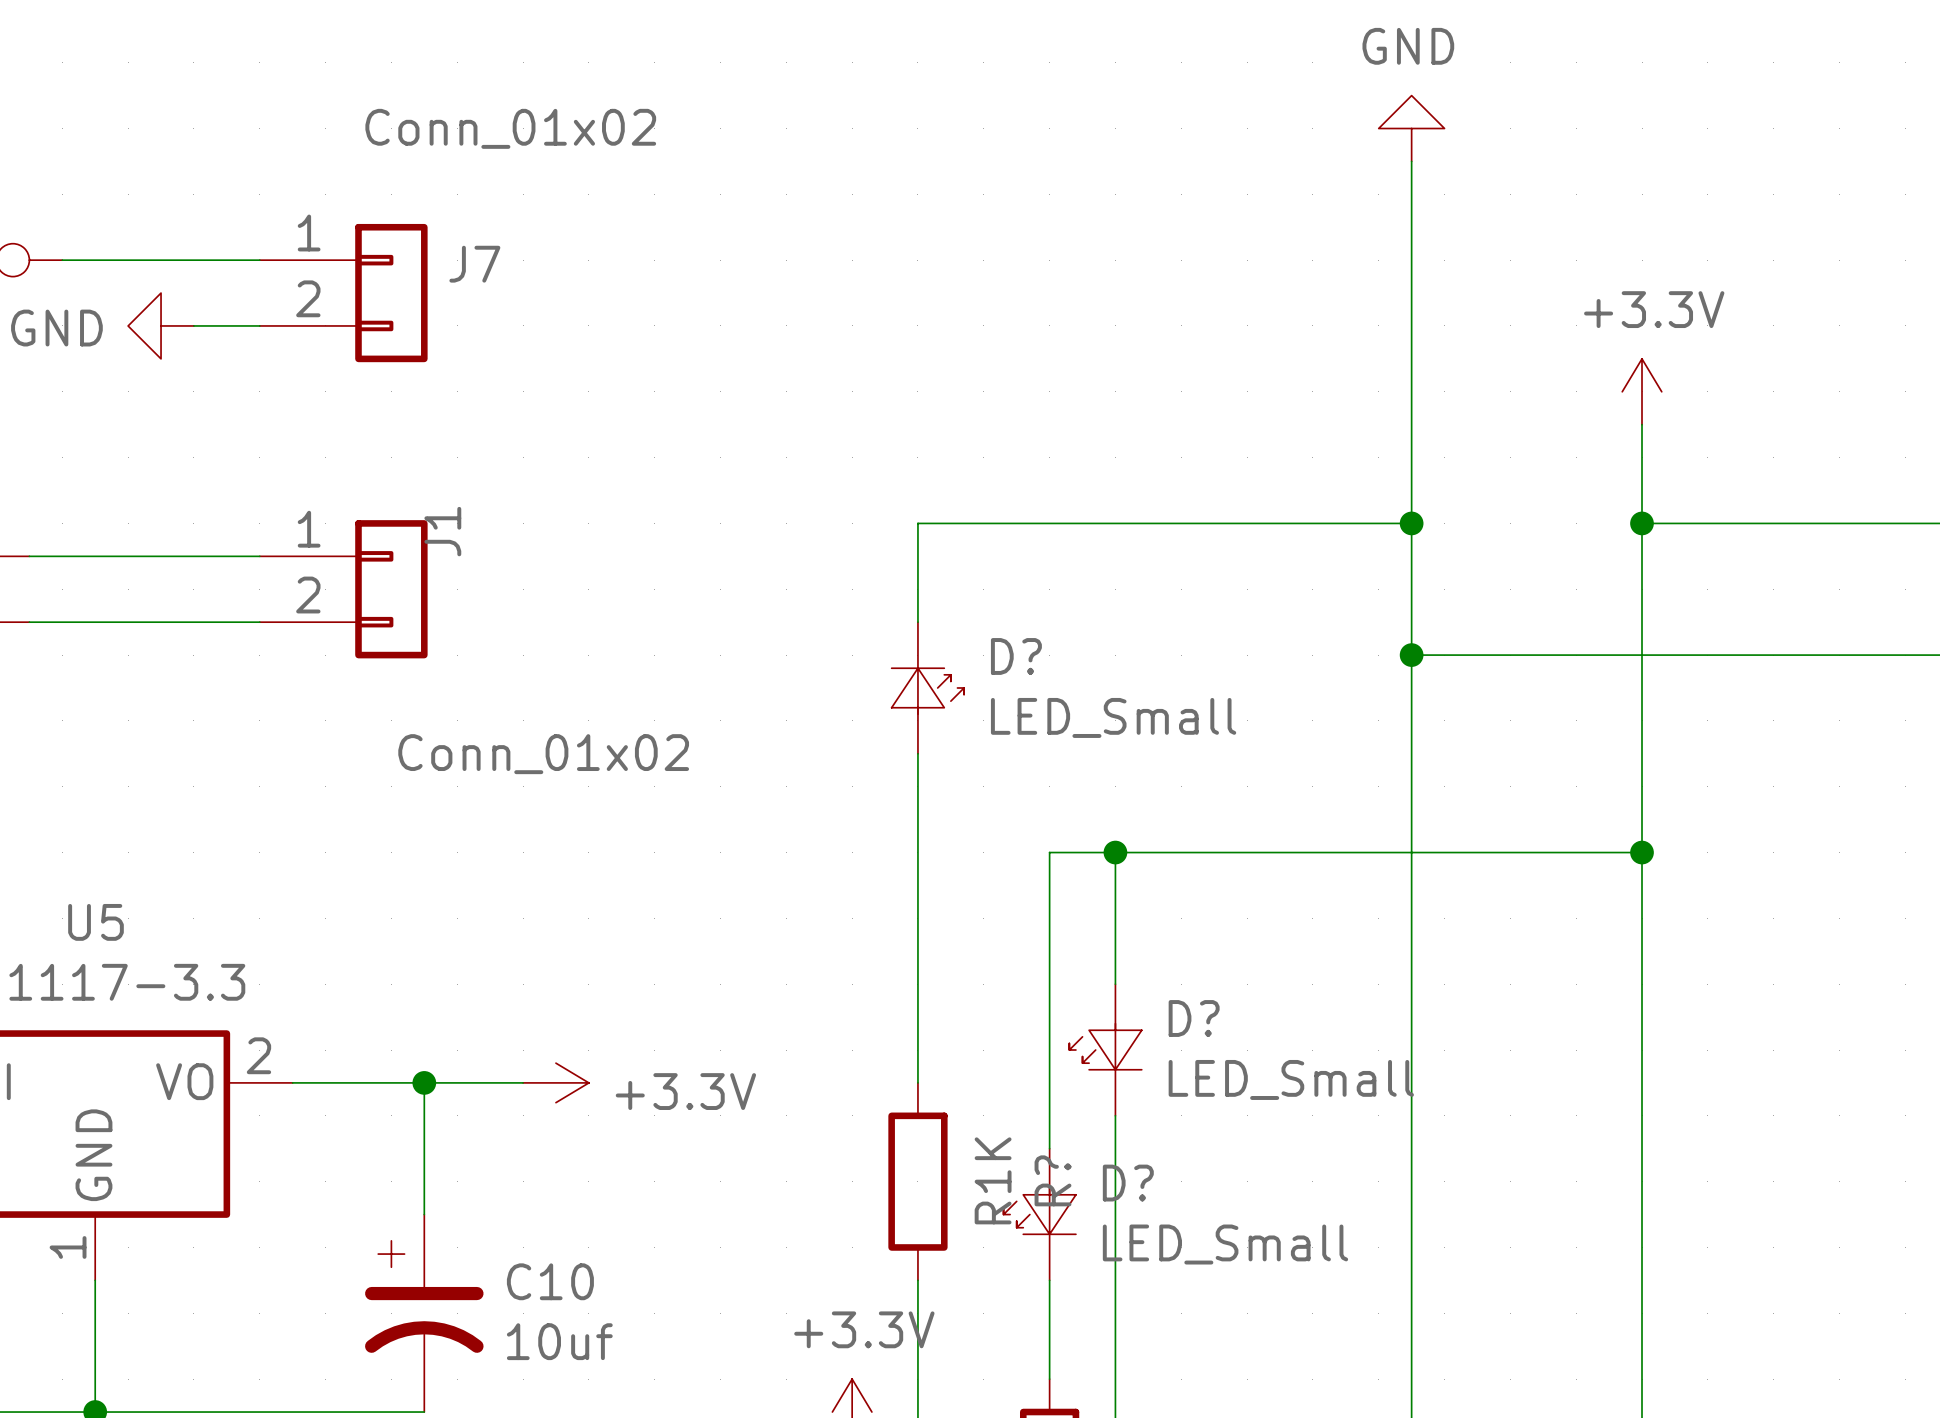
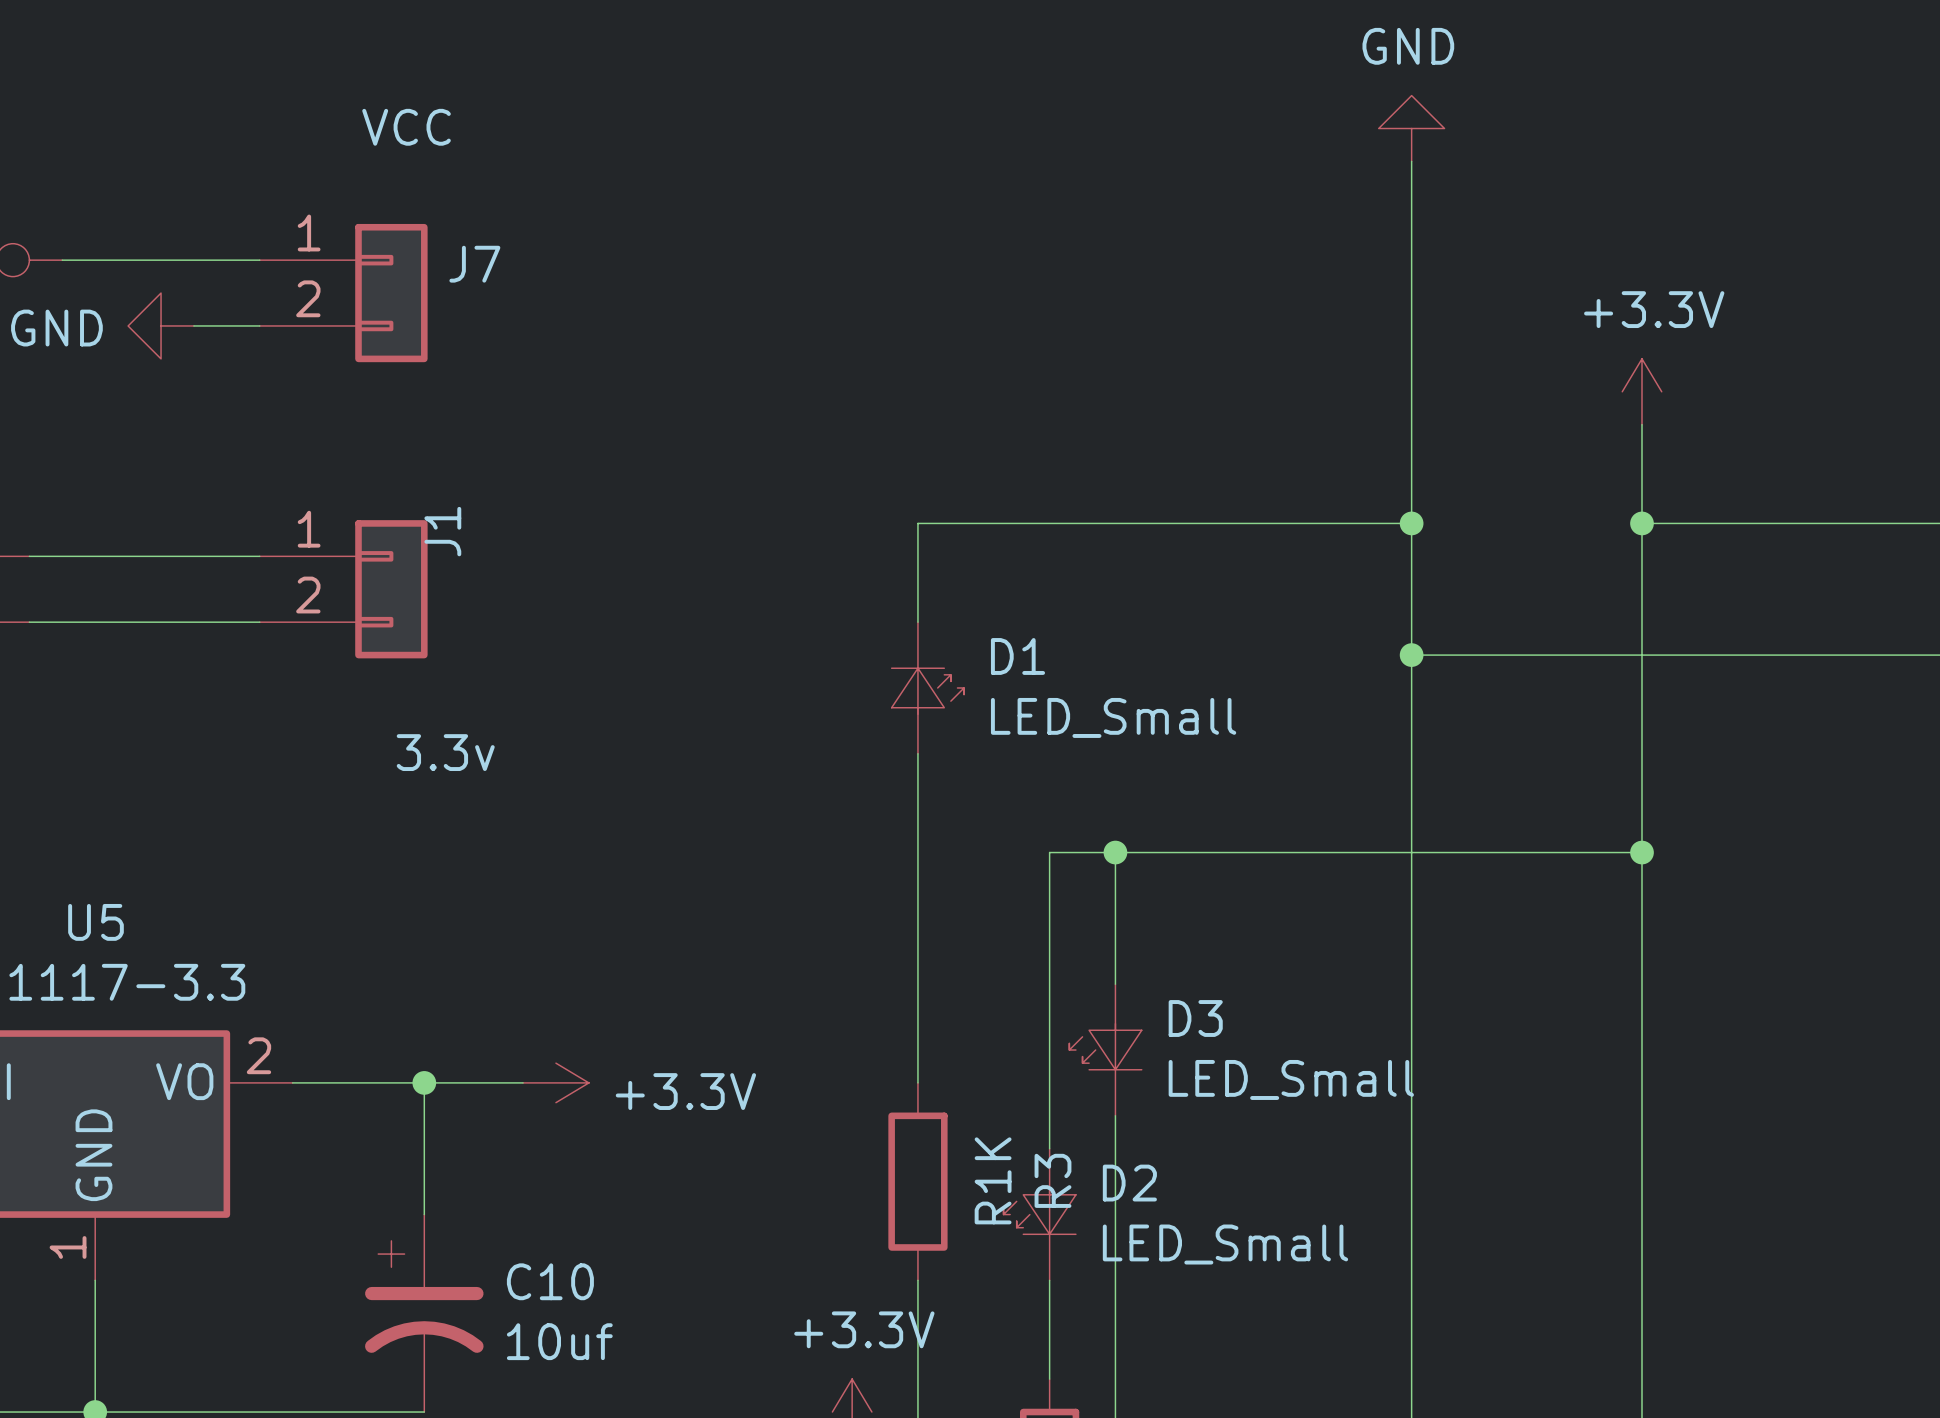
J7 value: Conn_01x02 (510, 128) -> VCC (406, 127)
D? name: D? (1016, 656) -> D1 (1017, 656)
J1 value: Conn_01x02 (543, 754) -> 3.3v (445, 752)
D? name: D? (1194, 1018) -> D3 (1195, 1018)
R? name: R? (1052, 1180) -> R3 (1052, 1180)
D? name: D? (1128, 1183) -> D2 (1129, 1183)

